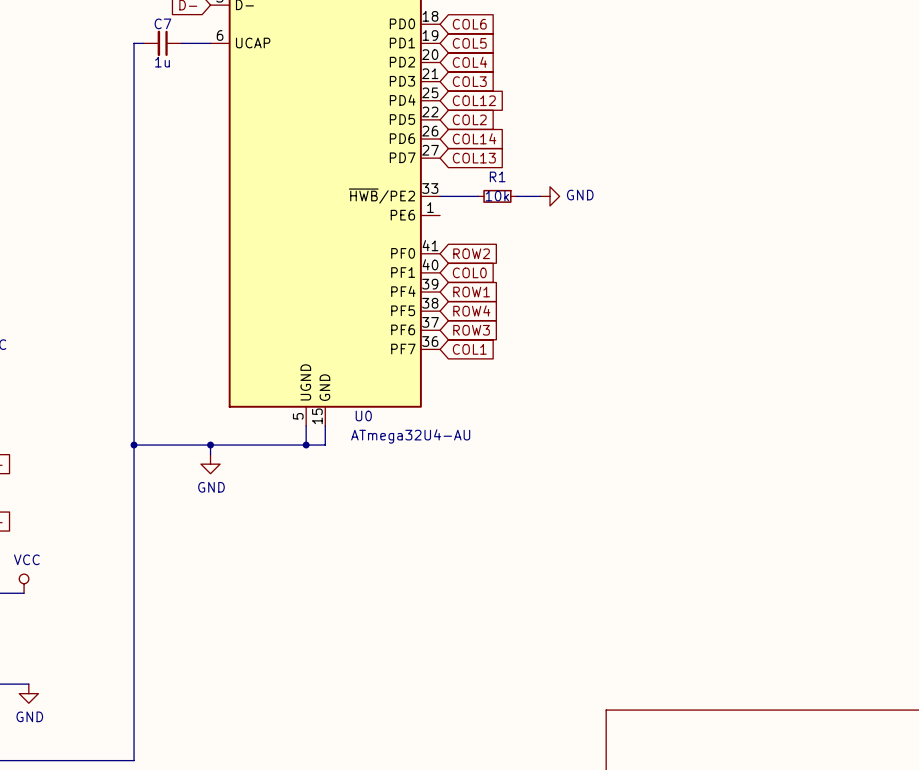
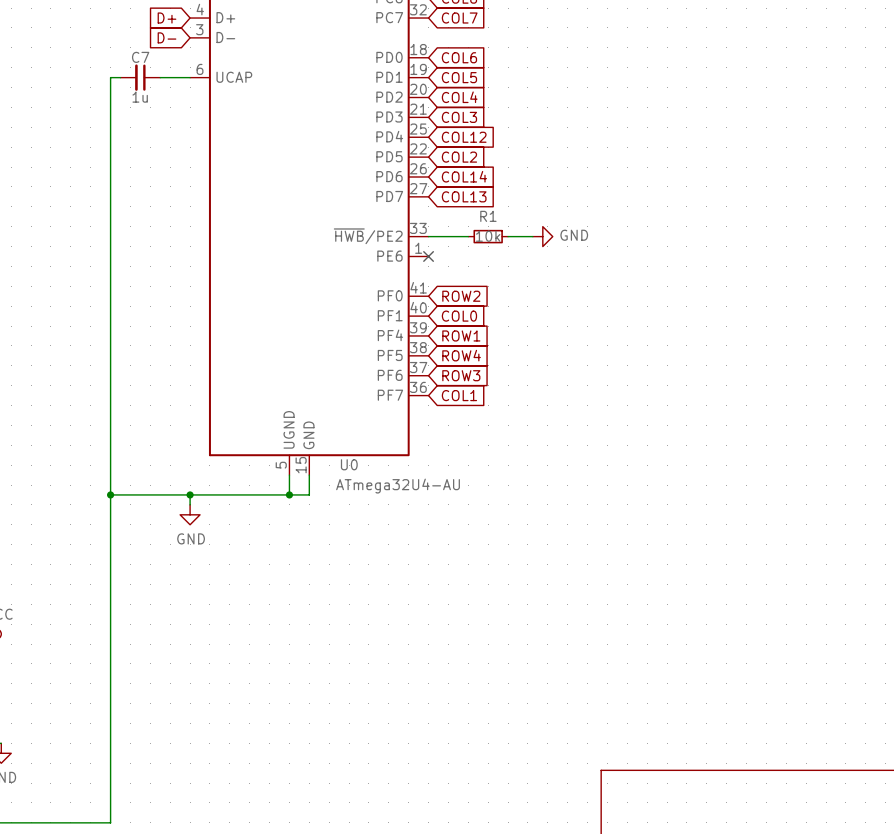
no-connect mark: none -> (428, 256)

